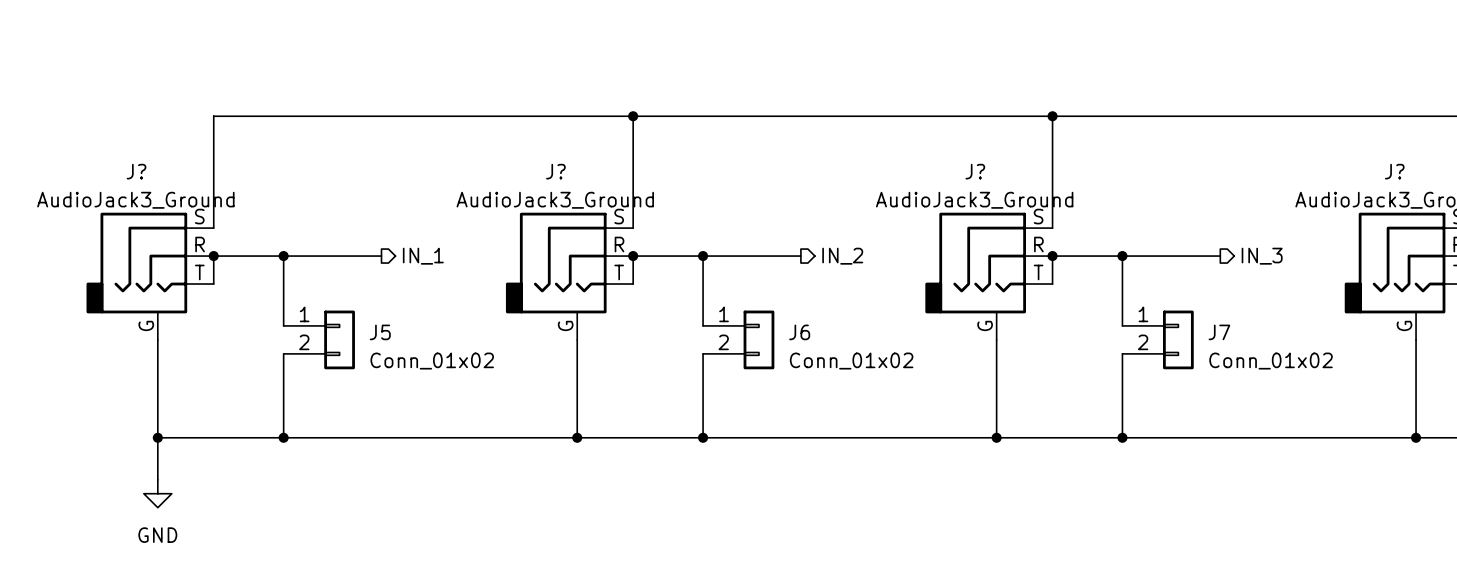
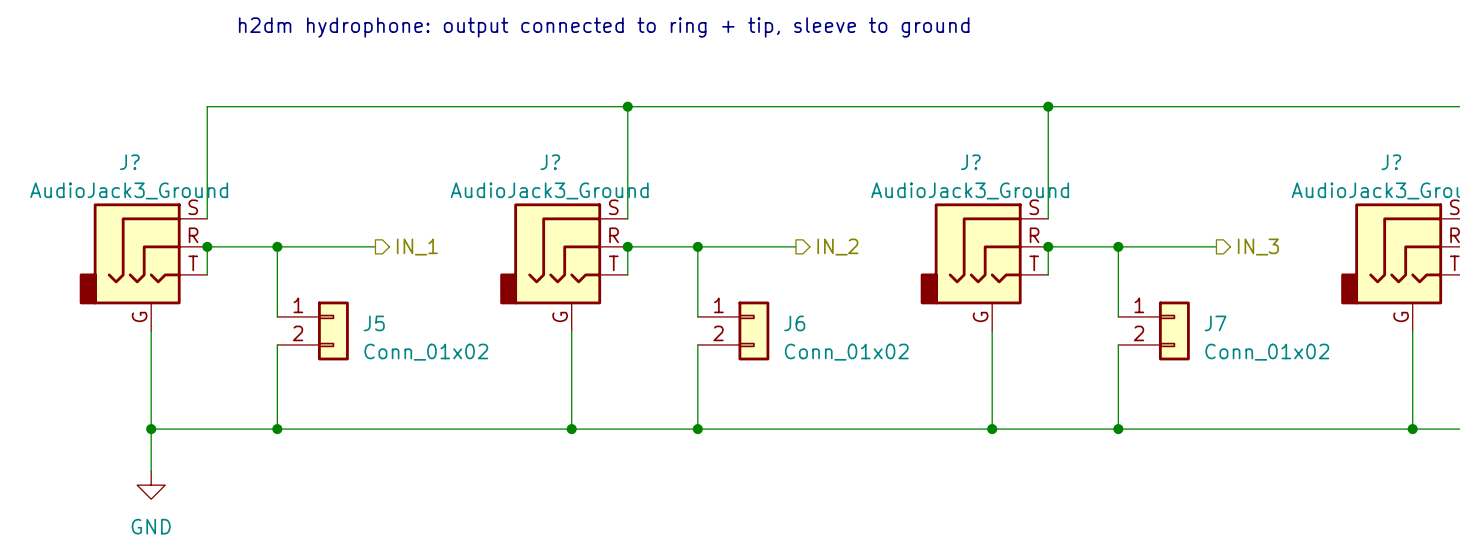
text: none -> h2dm hydrophone: output connected to ring + tip, sleeve to ground (604, 27)

